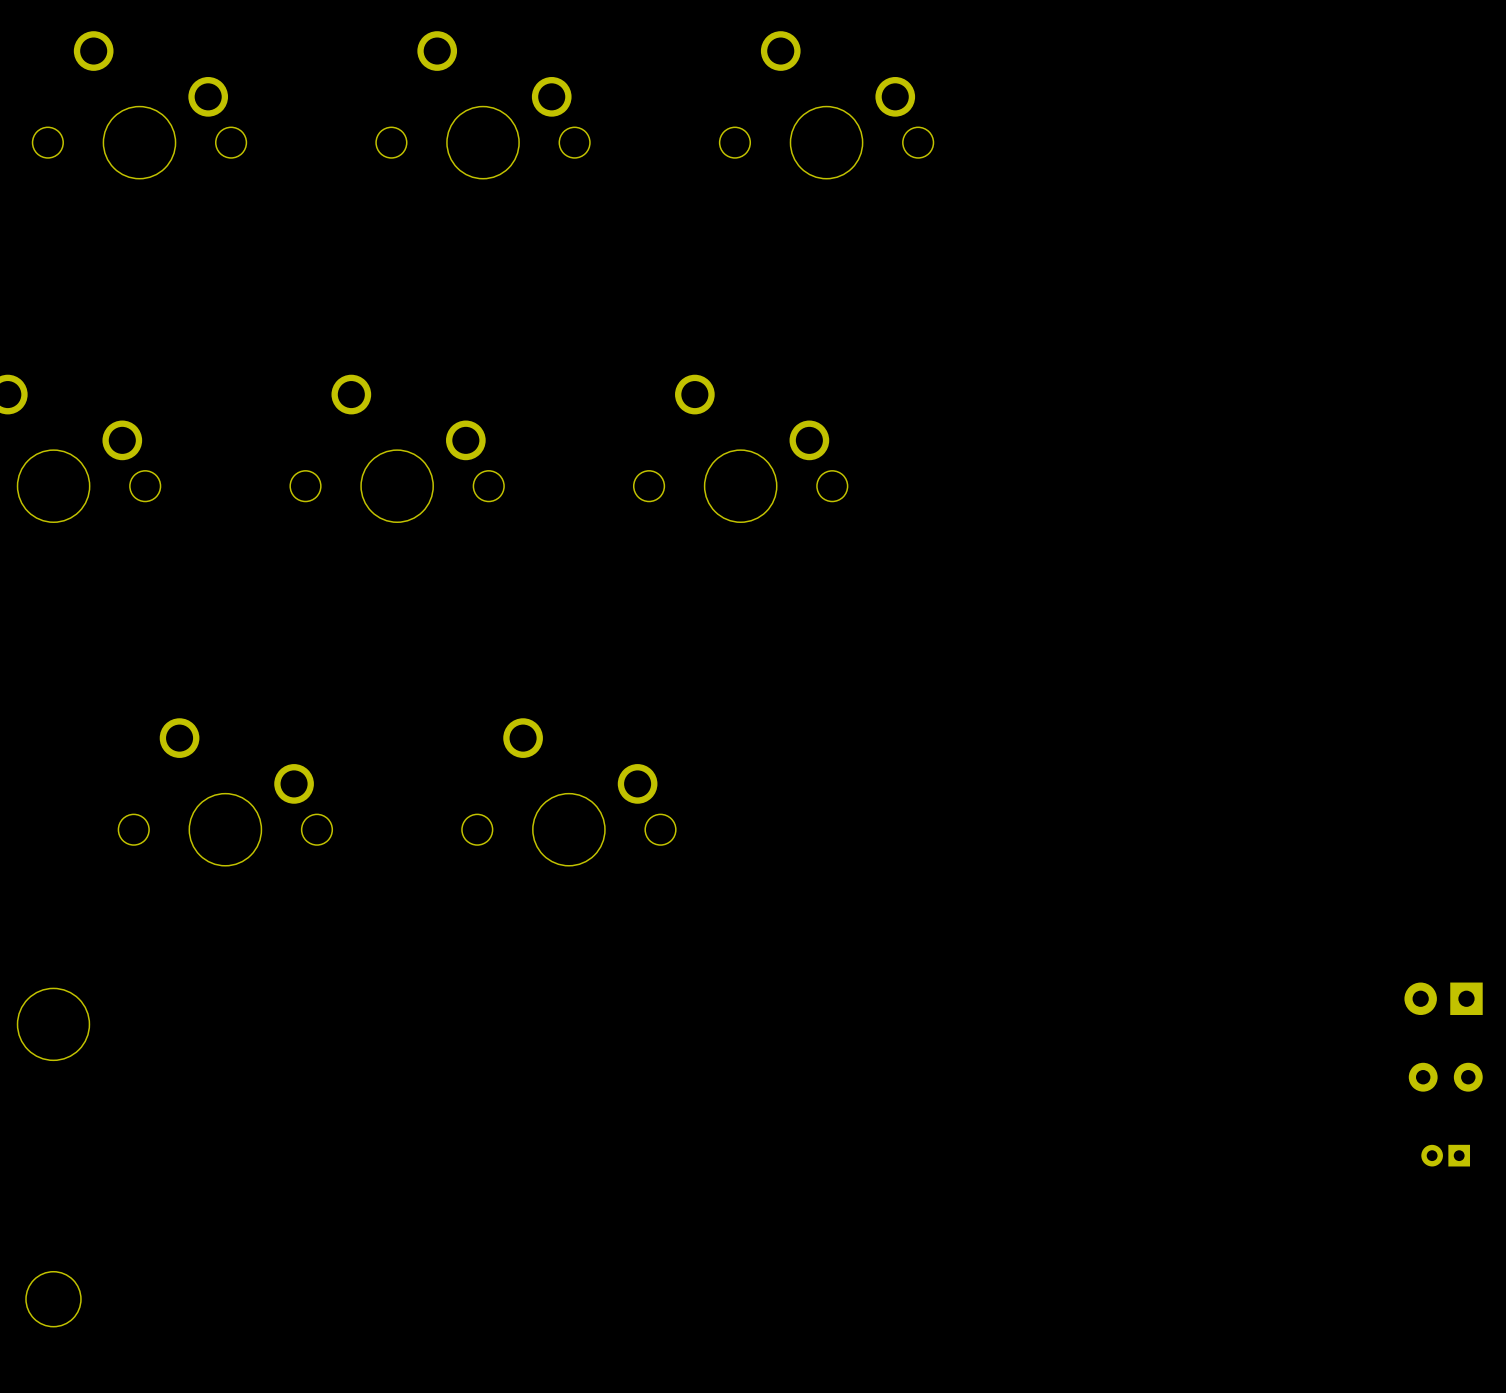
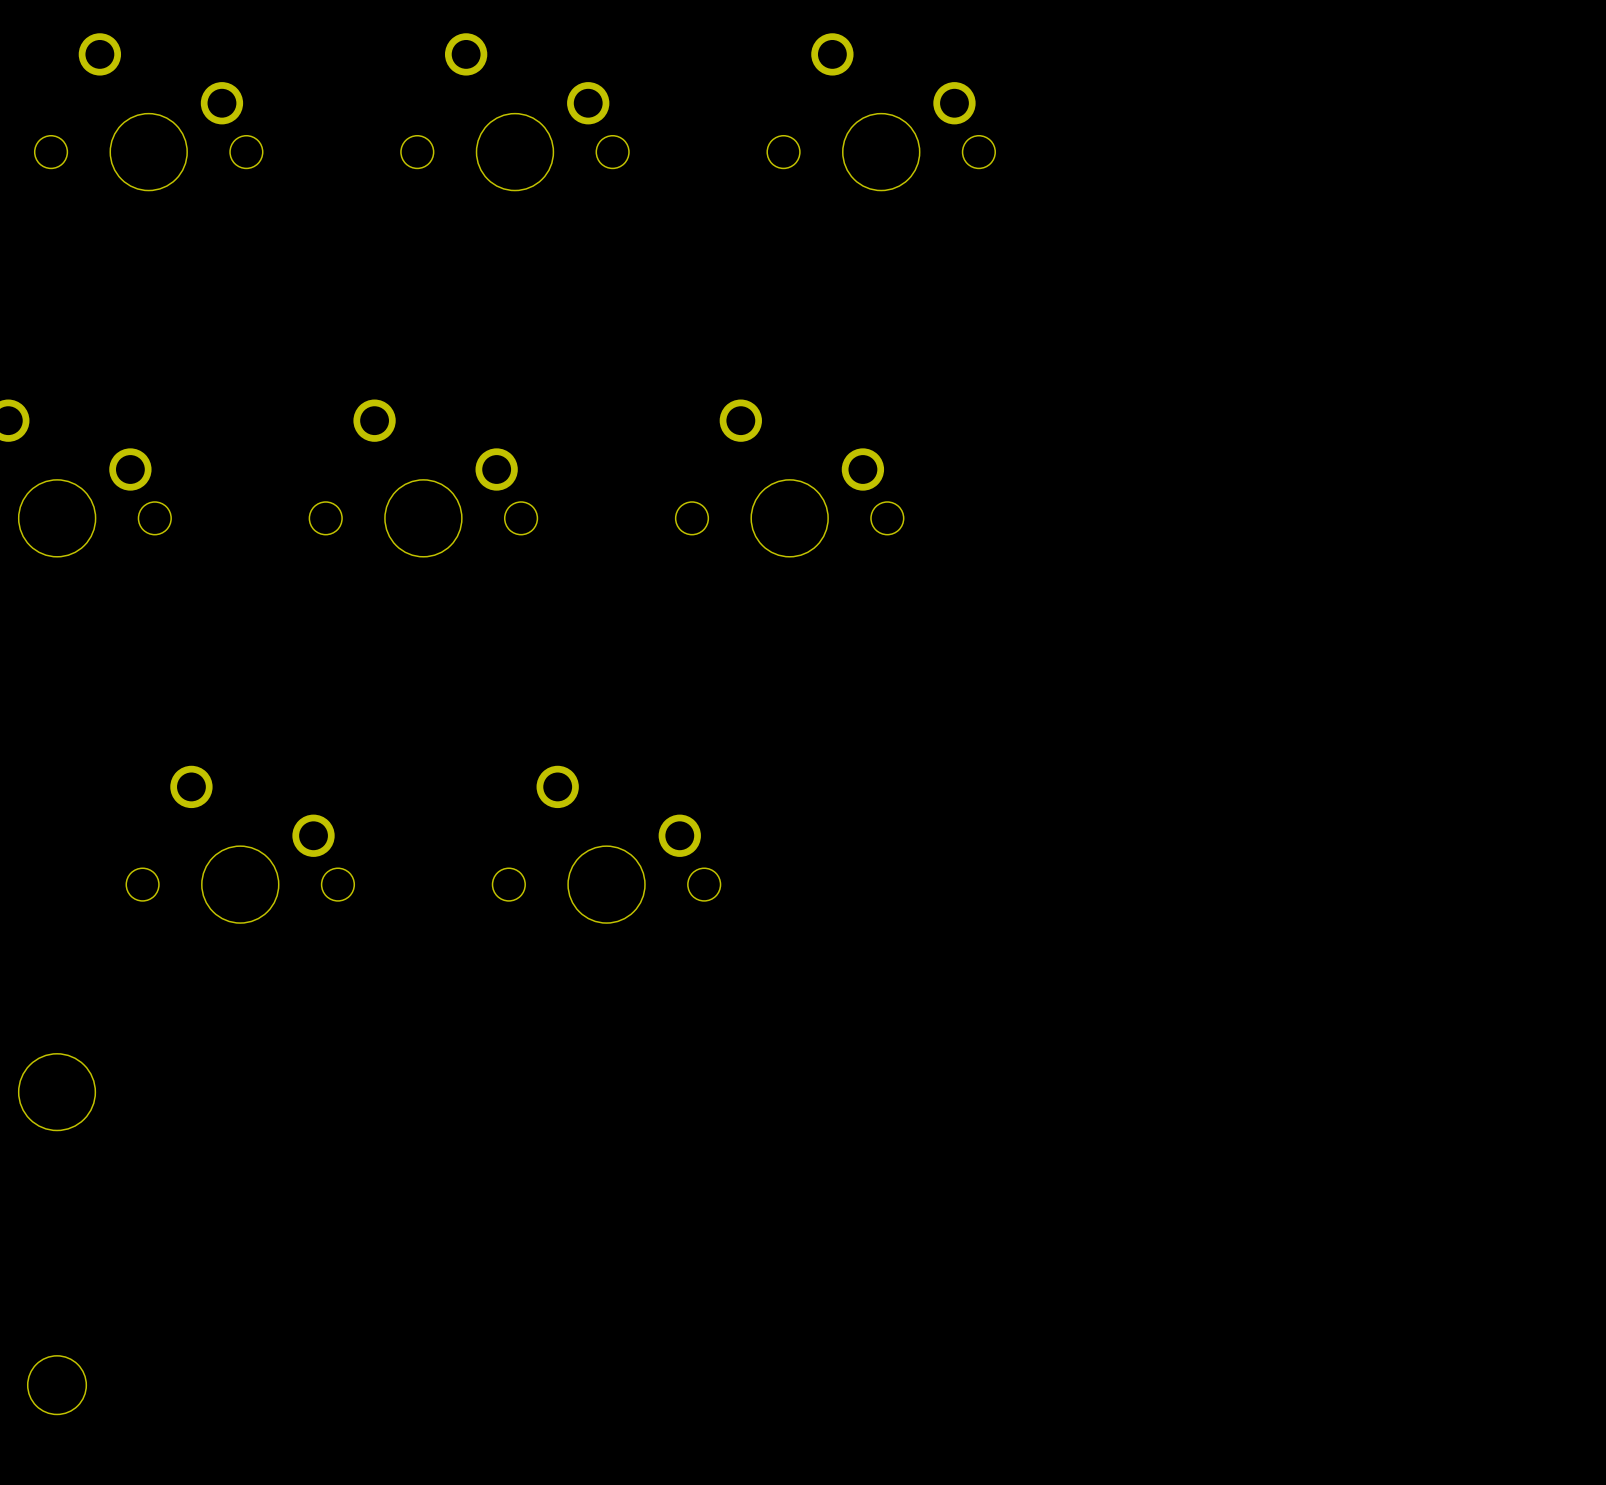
part: (1443, 998) -> none
part: (1445, 1077) -> none
part: (1445, 1155) -> none

